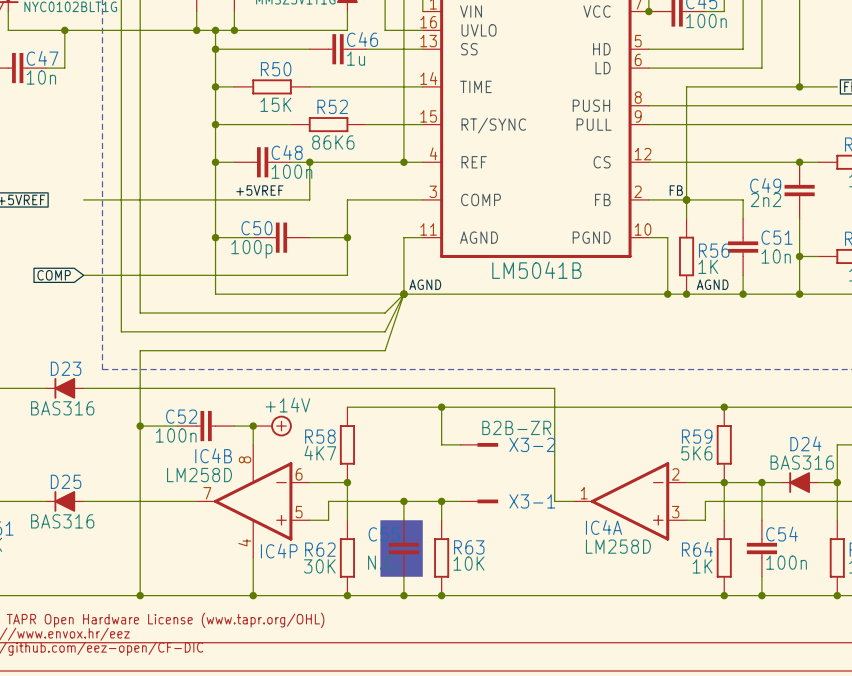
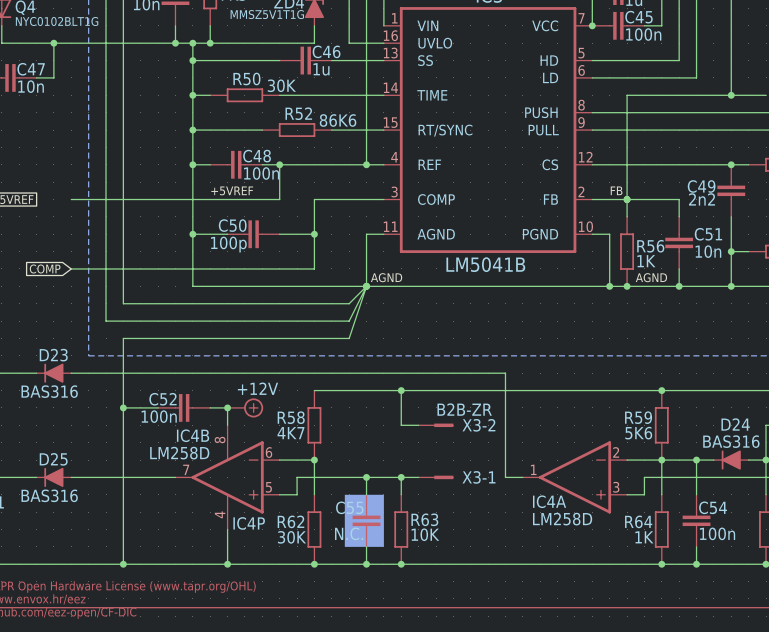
R50 value: 15K (275, 104) -> 30K (281, 85)
R52 value position: 86K6 (333, 142) -> 86K6 (338, 120)
power symbol: +14V (272, 426) -> +12V (245, 407)

